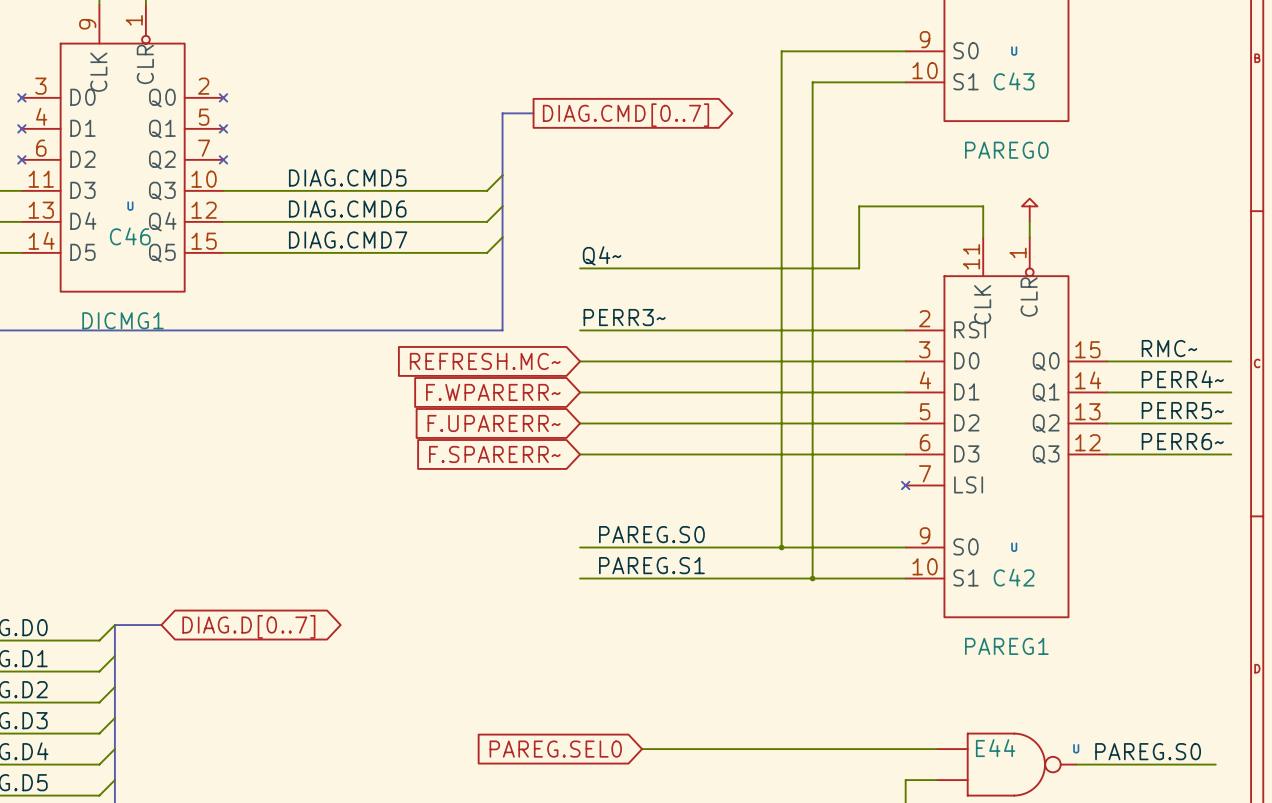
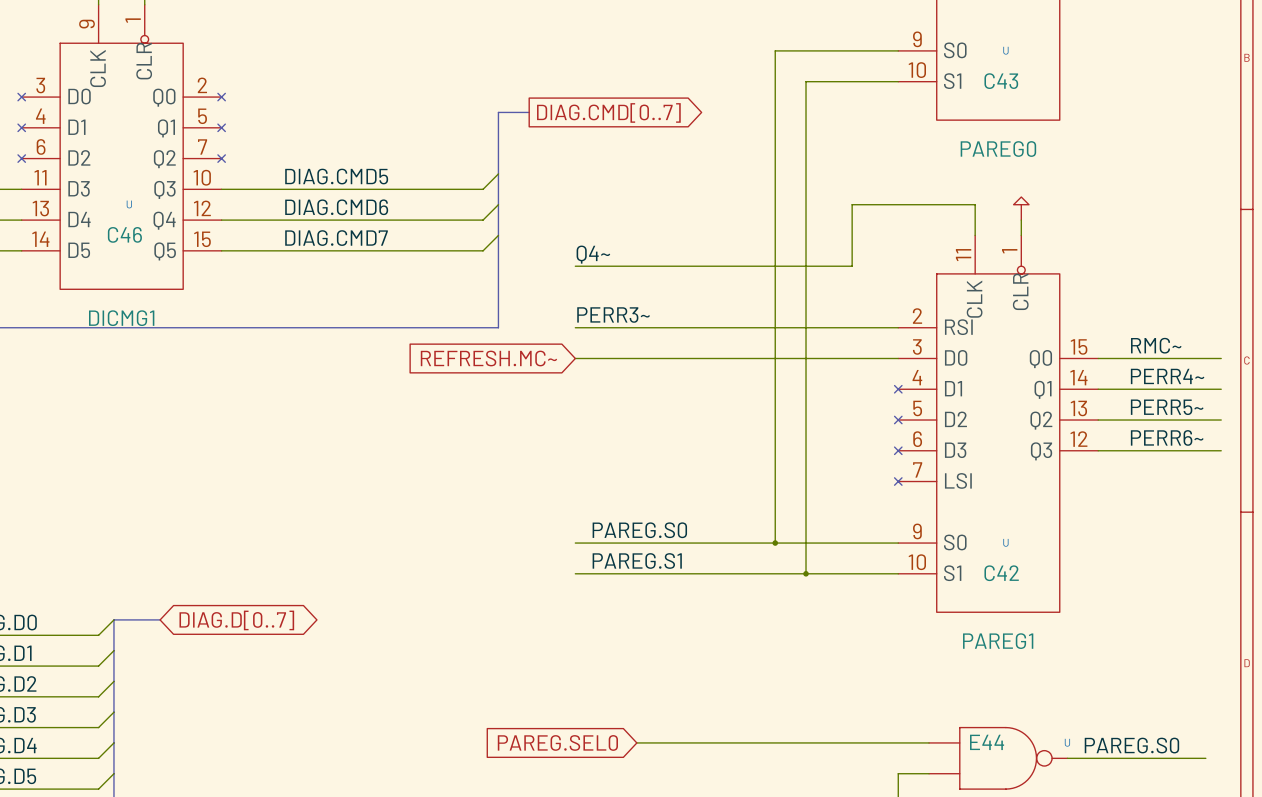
global label: F.WPARERR~ (493, 392) -> none
wire: (580, 392) (905, 392) -> none
no-connect mark: none -> (898, 389)
global label: F.UPARERR~ (494, 423) -> none
wire: (580, 423) (905, 423) -> none
no-connect mark: none -> (898, 420)
global label: F.SPARERR~ (494, 454) -> none
wire: (580, 454) (905, 454) -> none
no-connect mark: none -> (898, 450)

